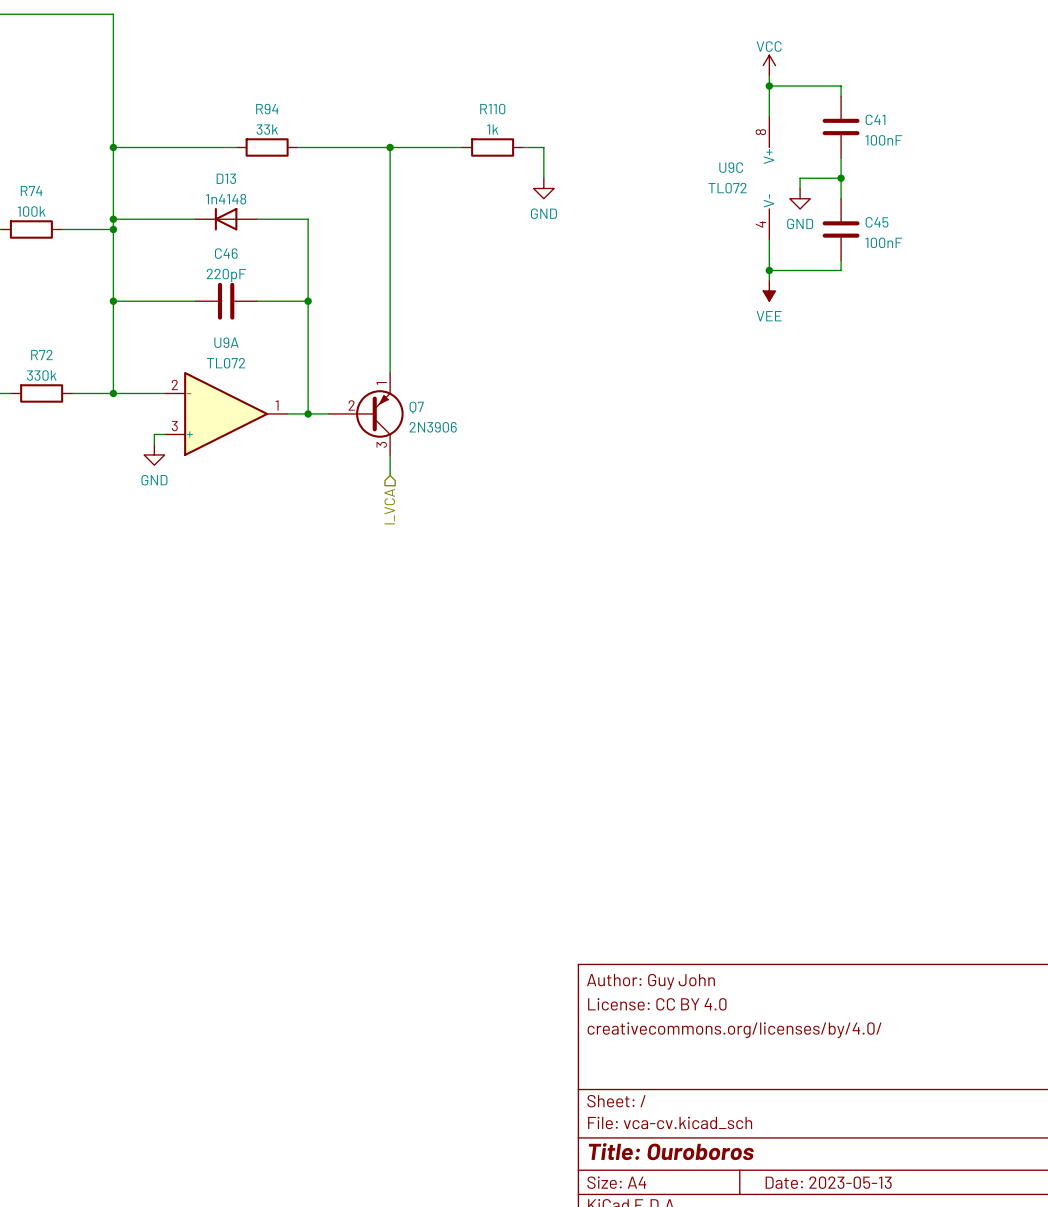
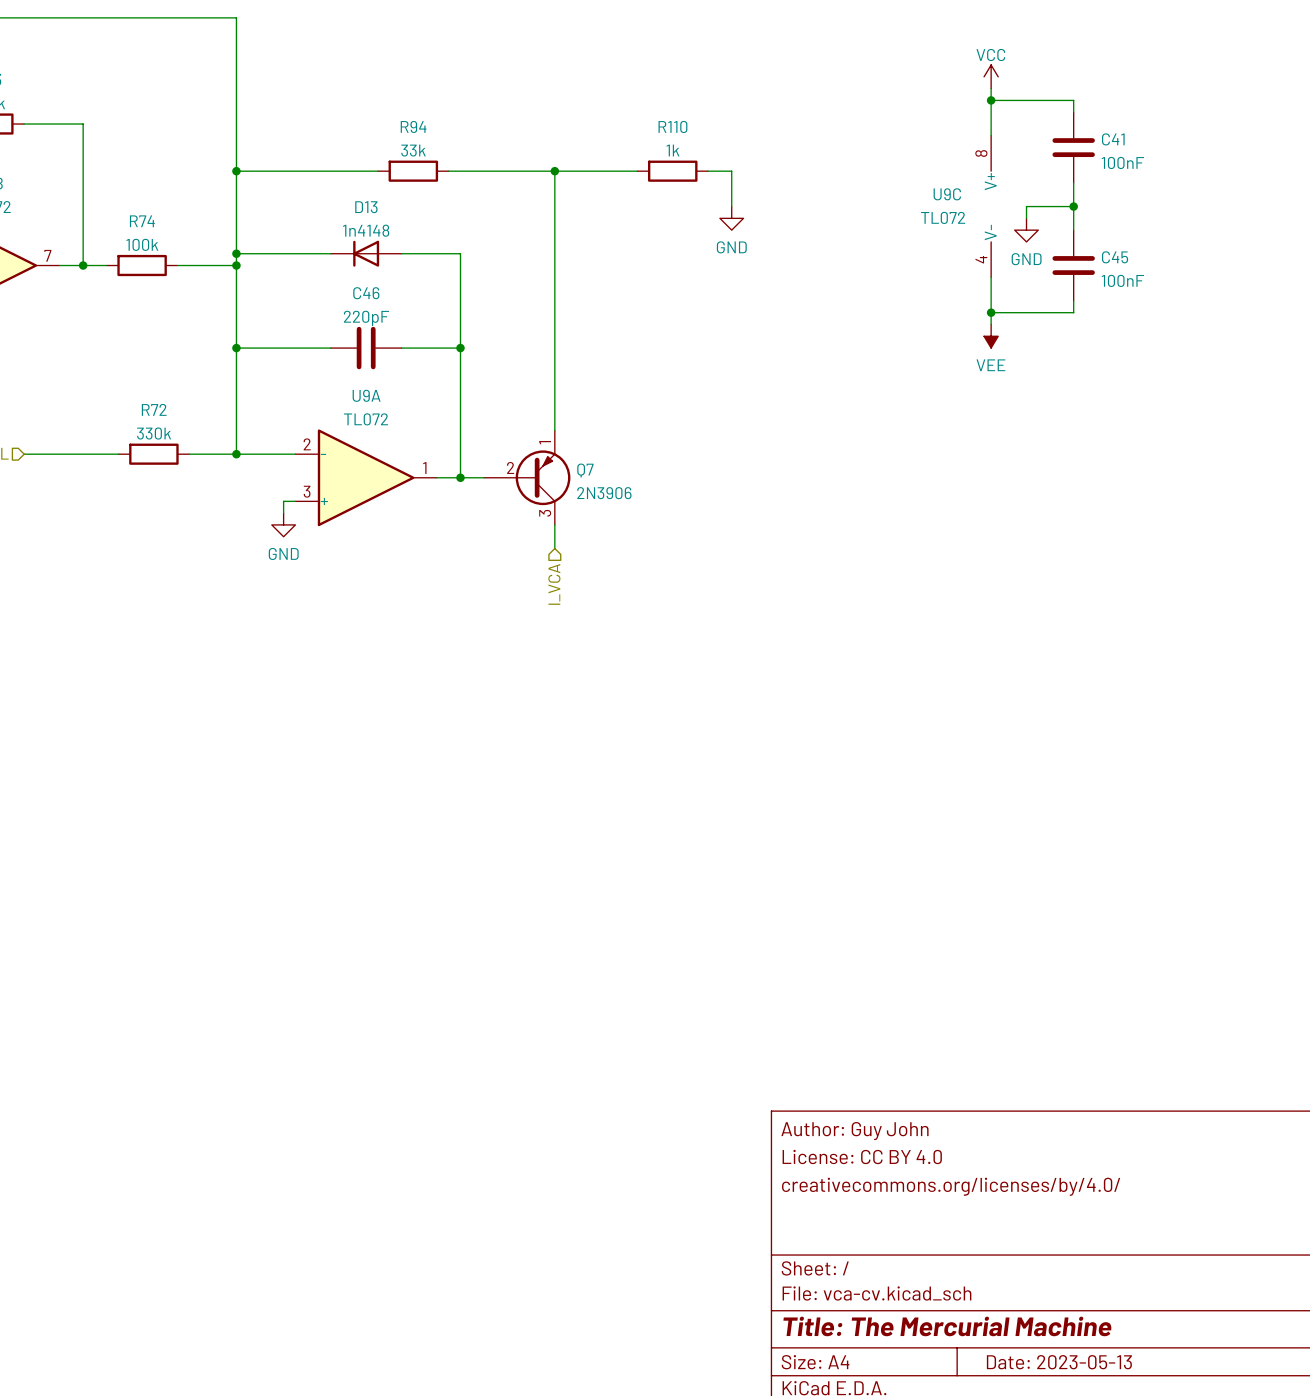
title block: Title: Ouroboros (671, 1151) -> Title: The Mercurial Machine (947, 1326)

